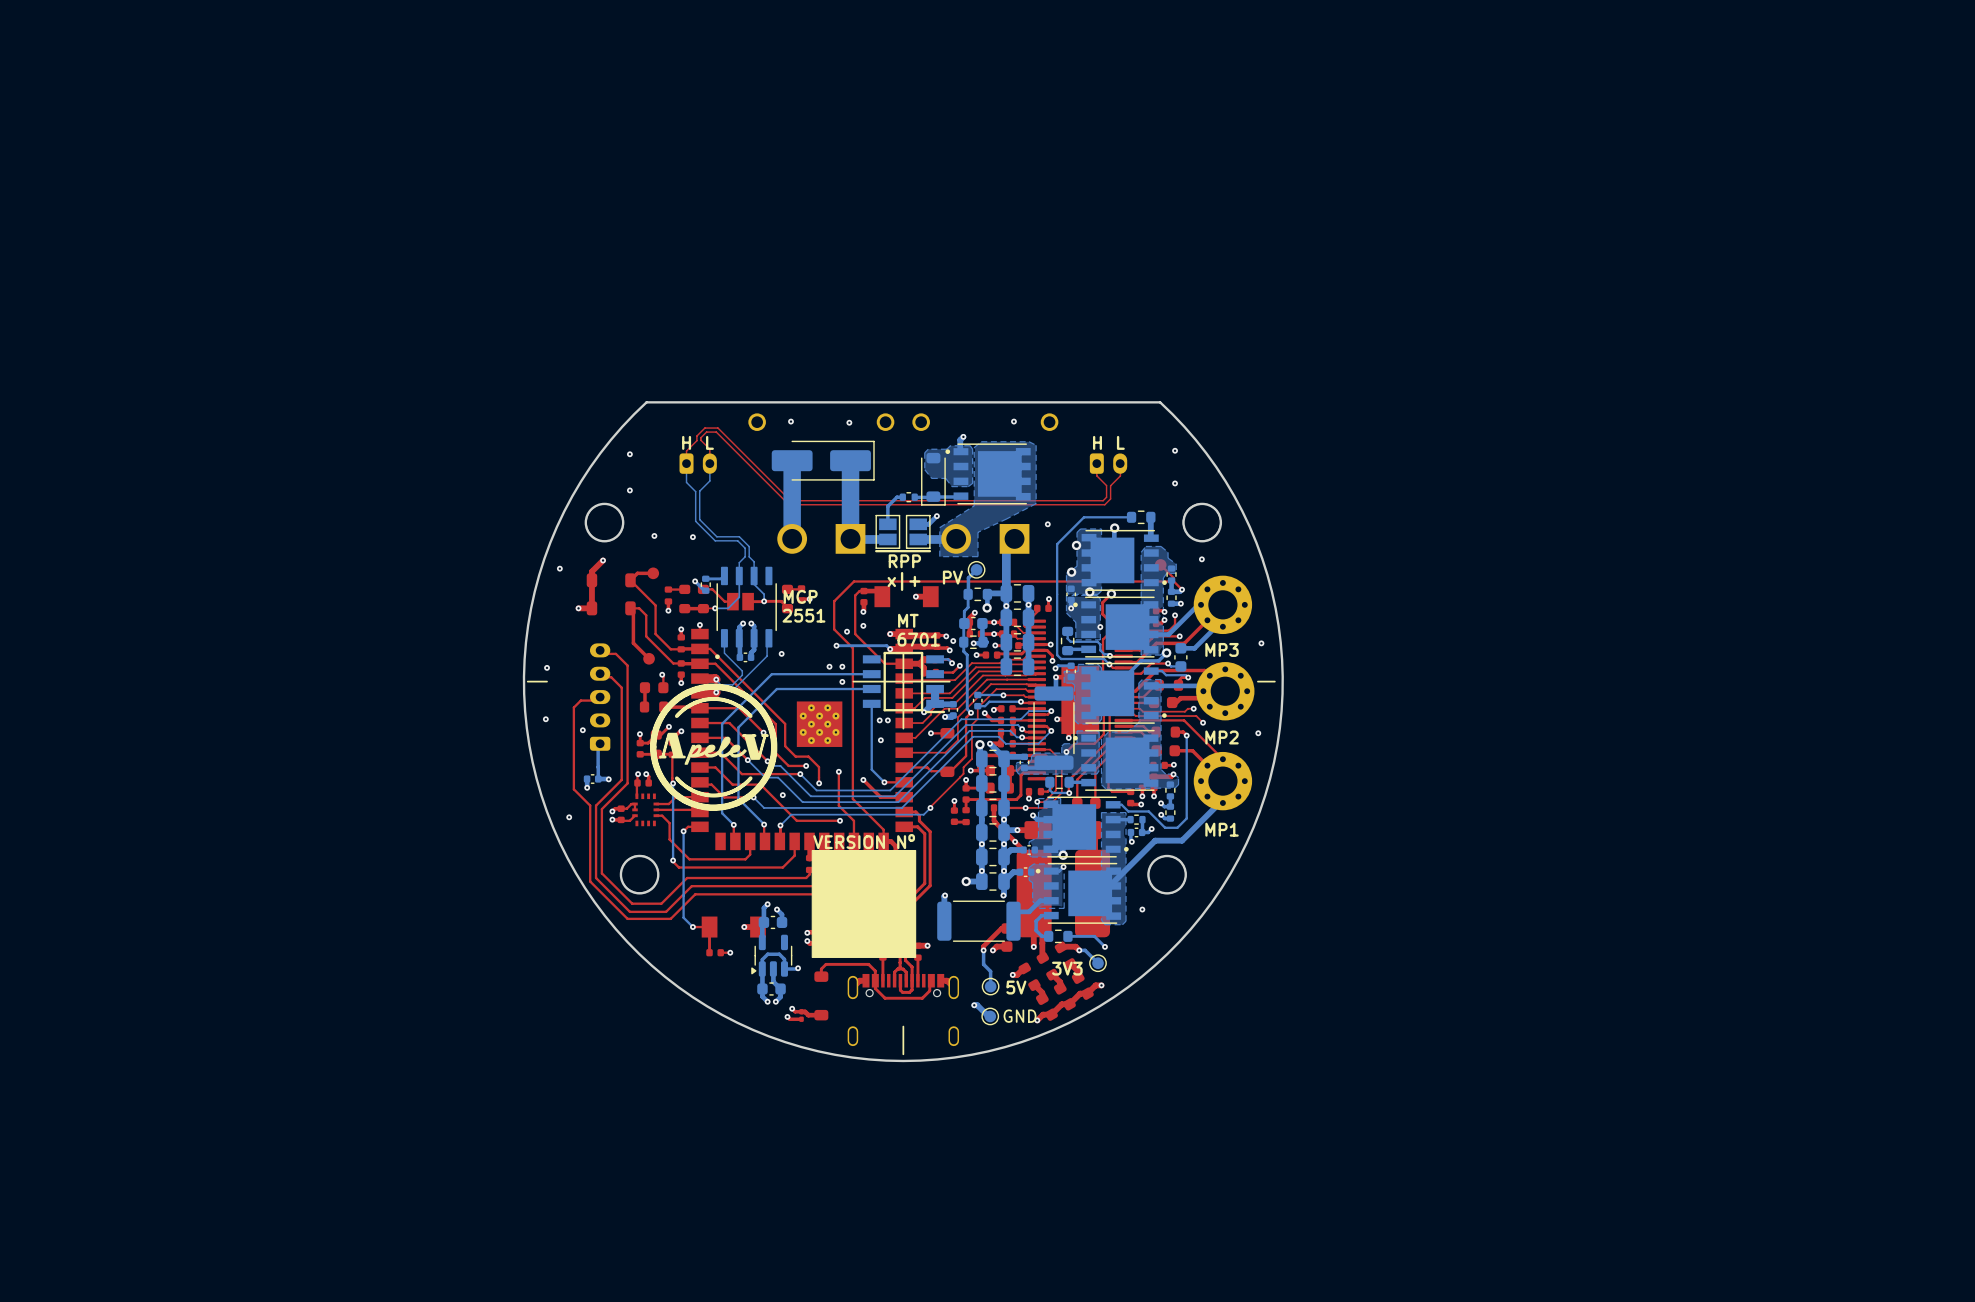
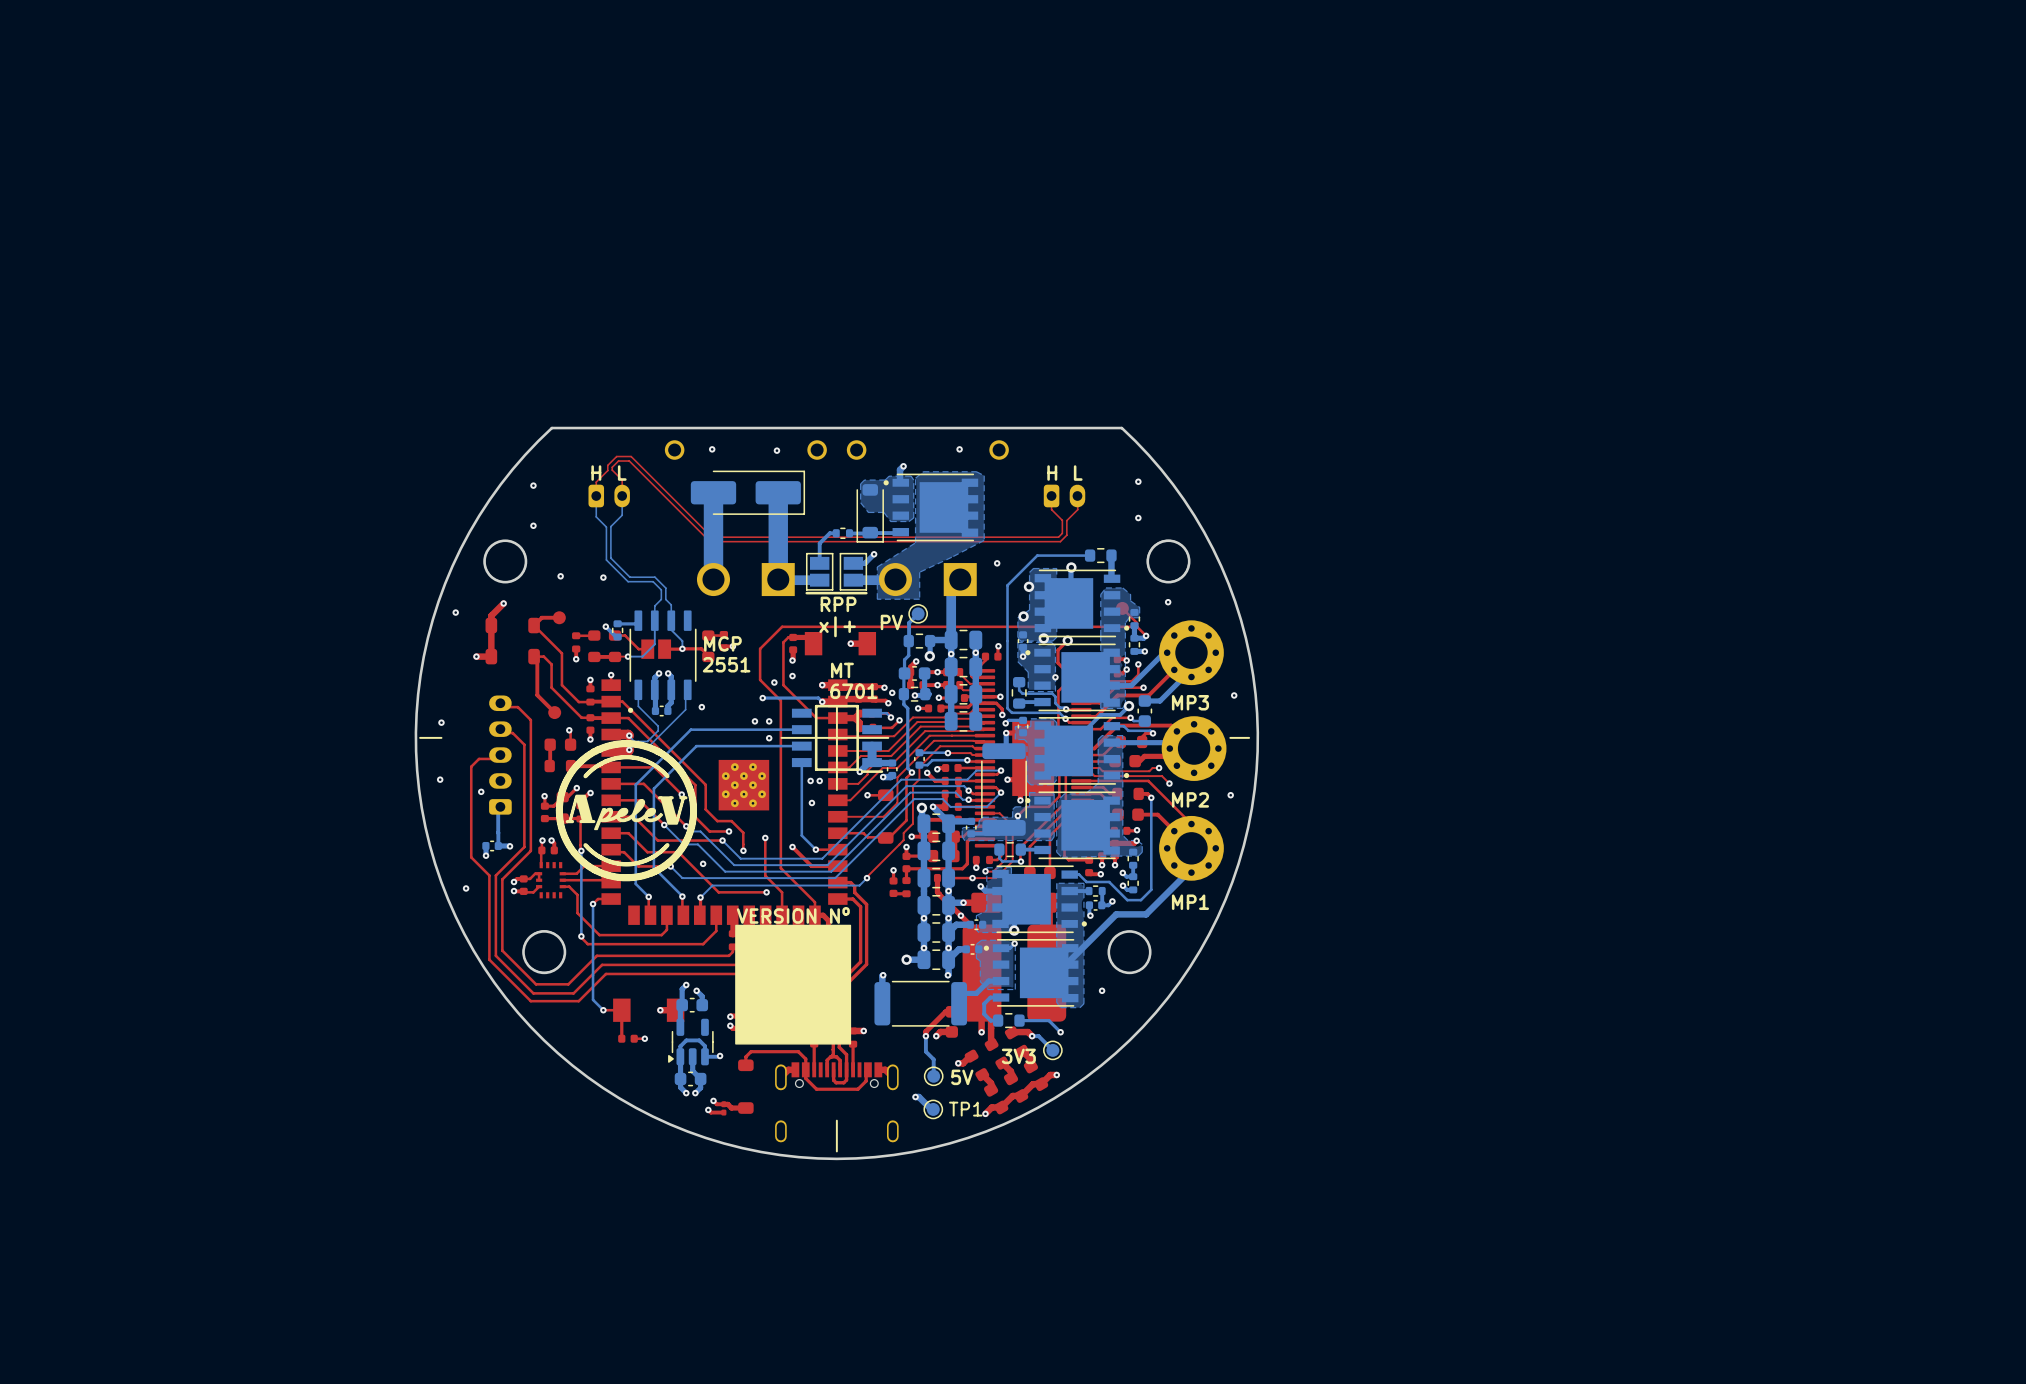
GND name: GND (1020, 1016) -> TP1 (965, 1109)

